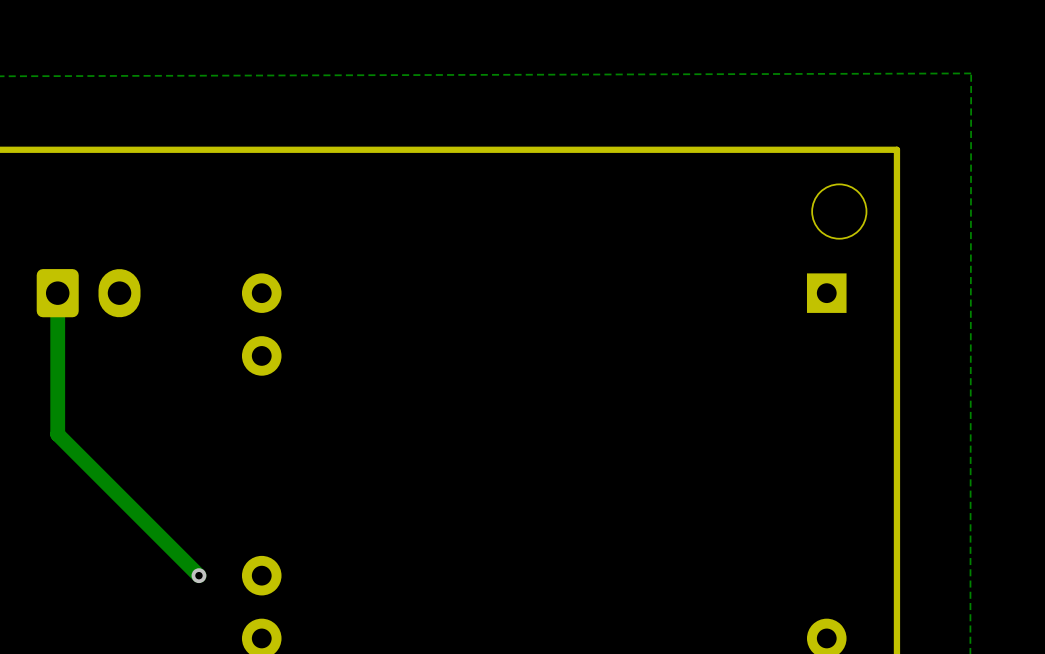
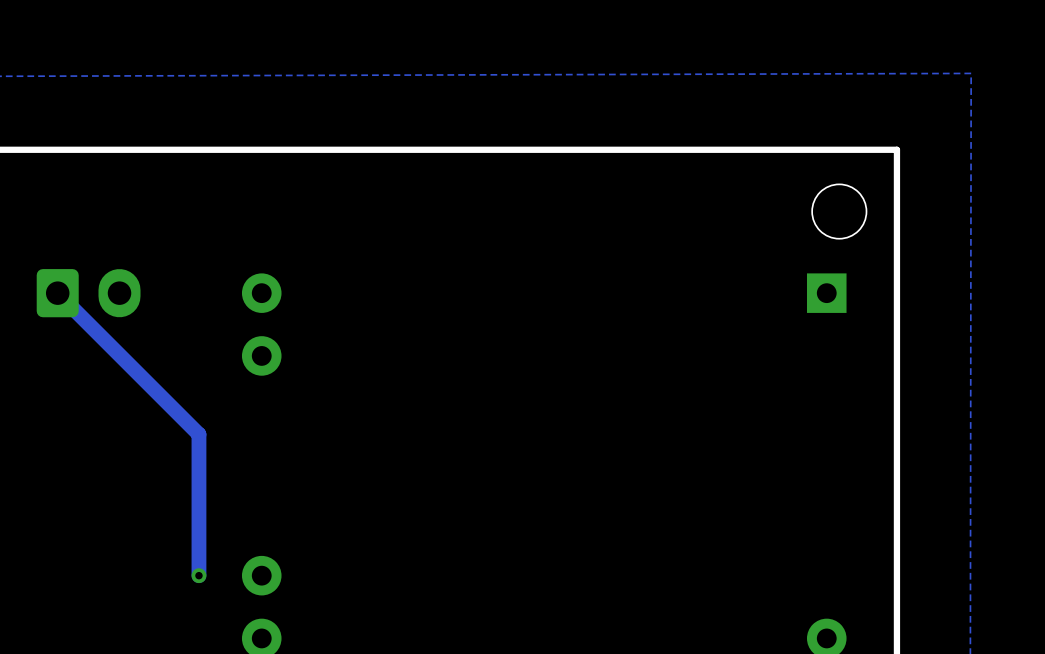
track: (57, 293) (57, 434) (198, 575) -> (57, 293) (198, 434) (198, 575)

